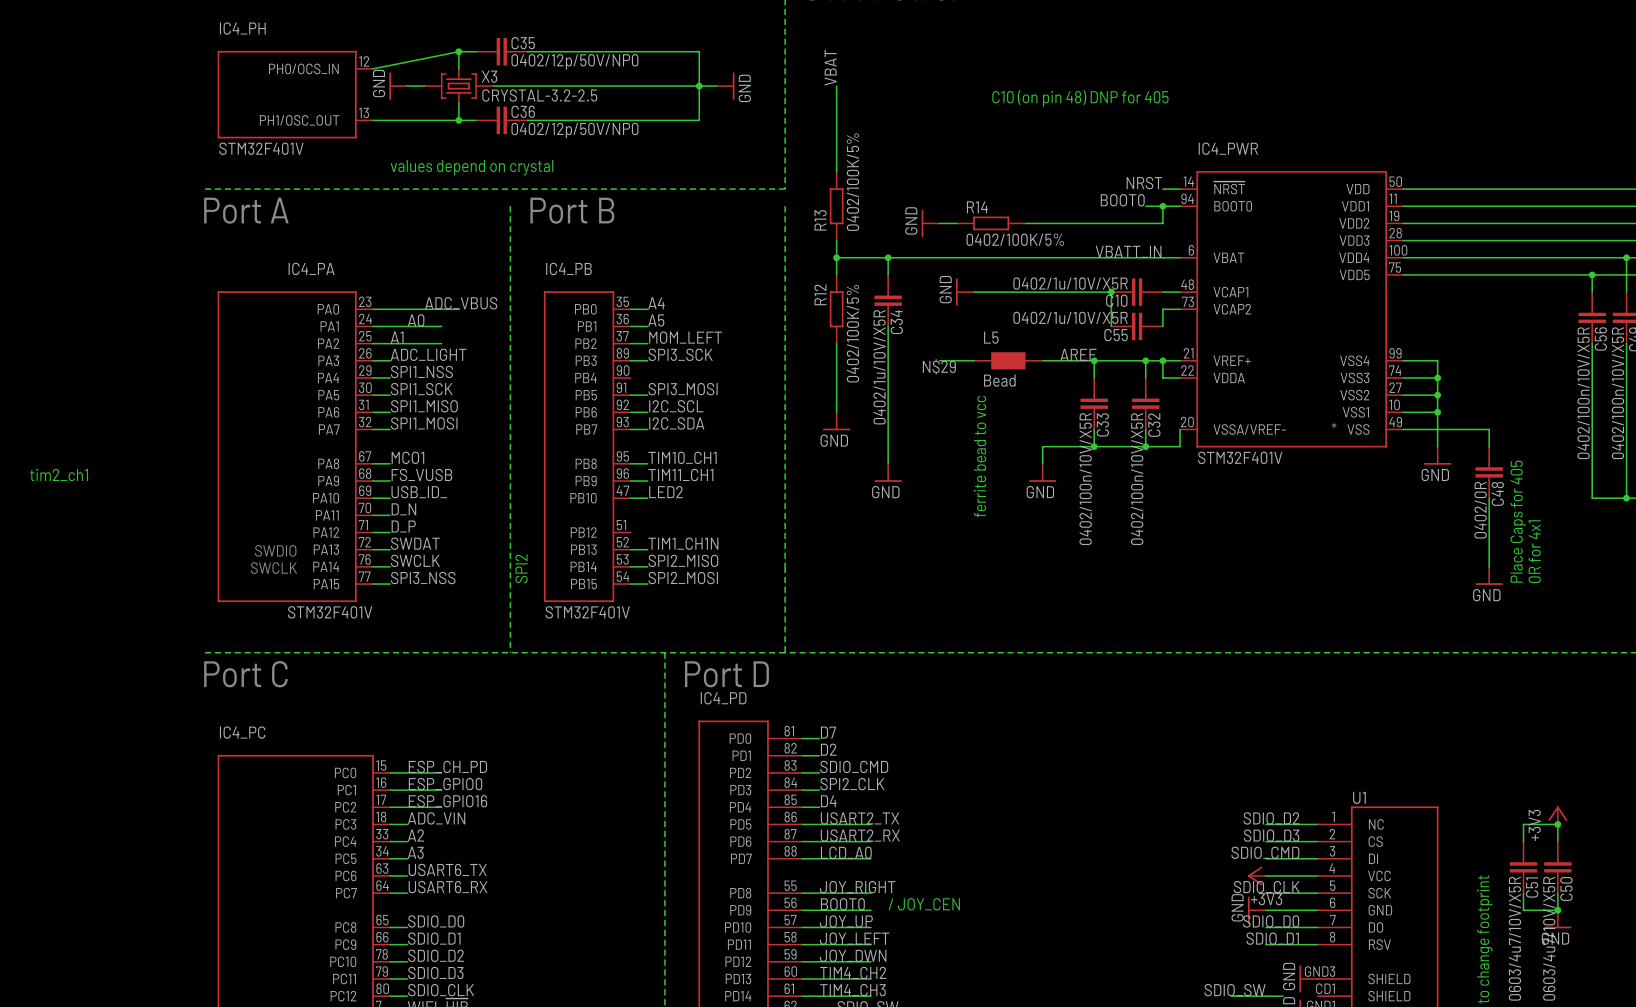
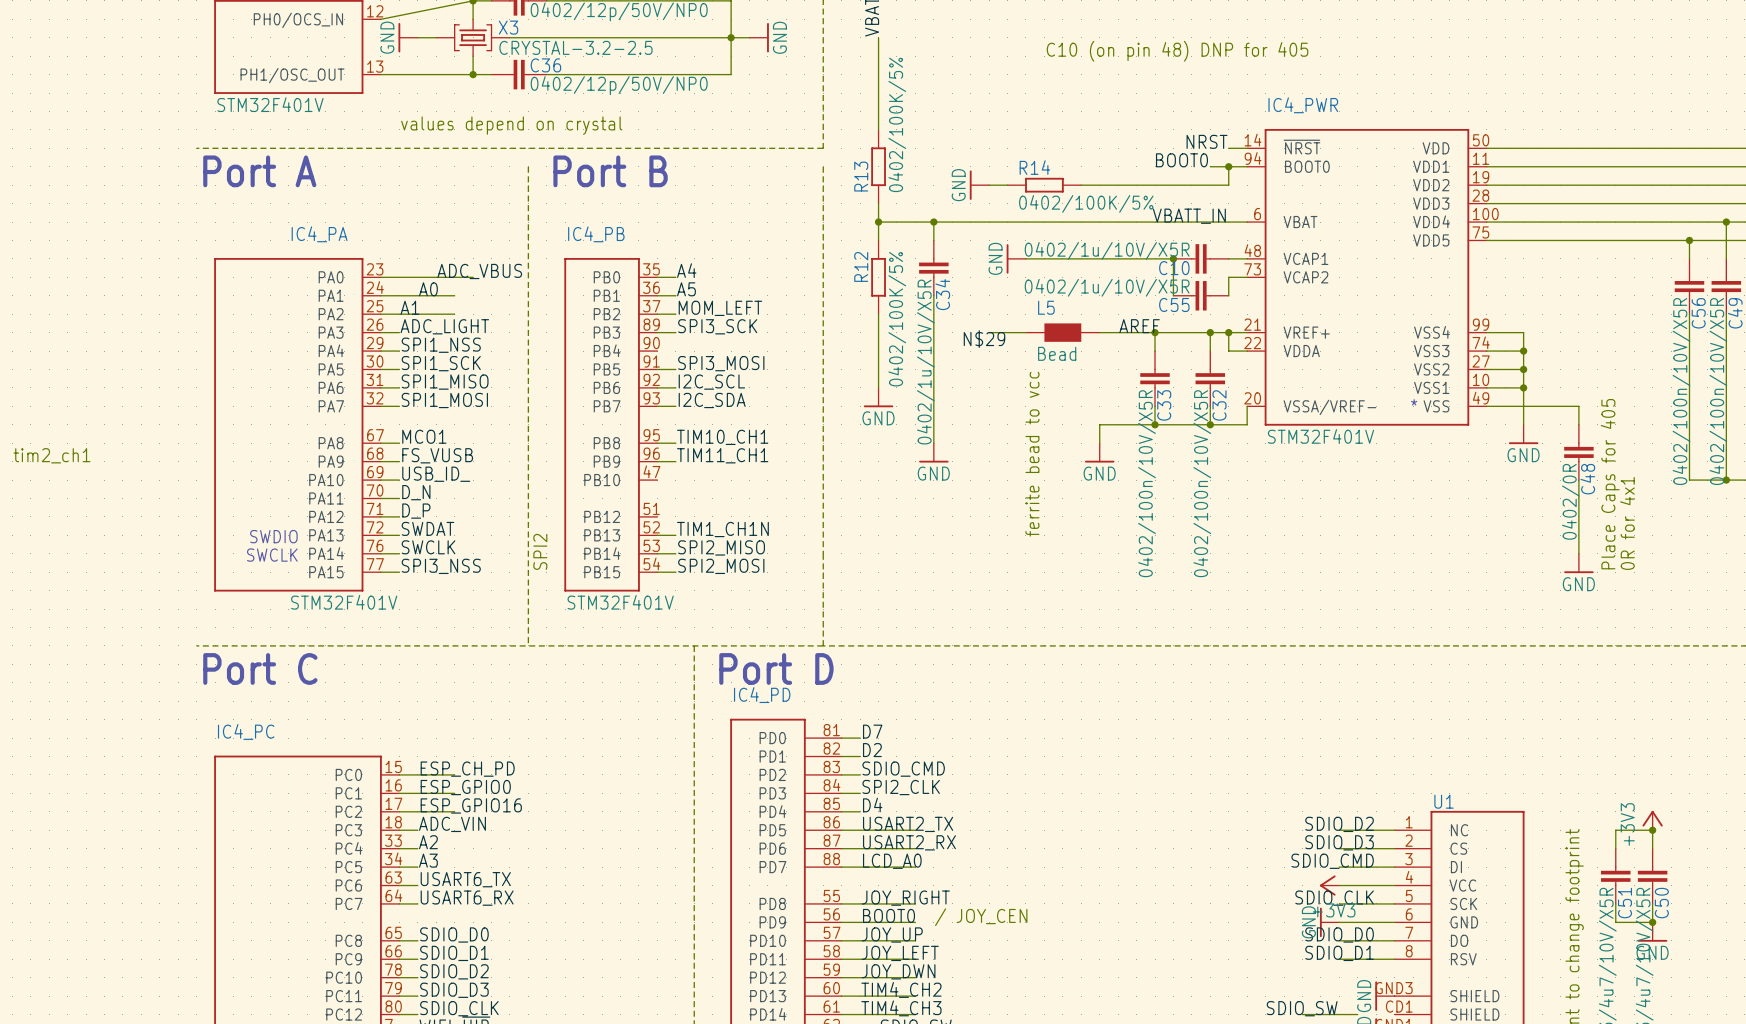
label: LED2 (666, 492) -> none
wire: (630, 498) (647, 498) -> none

